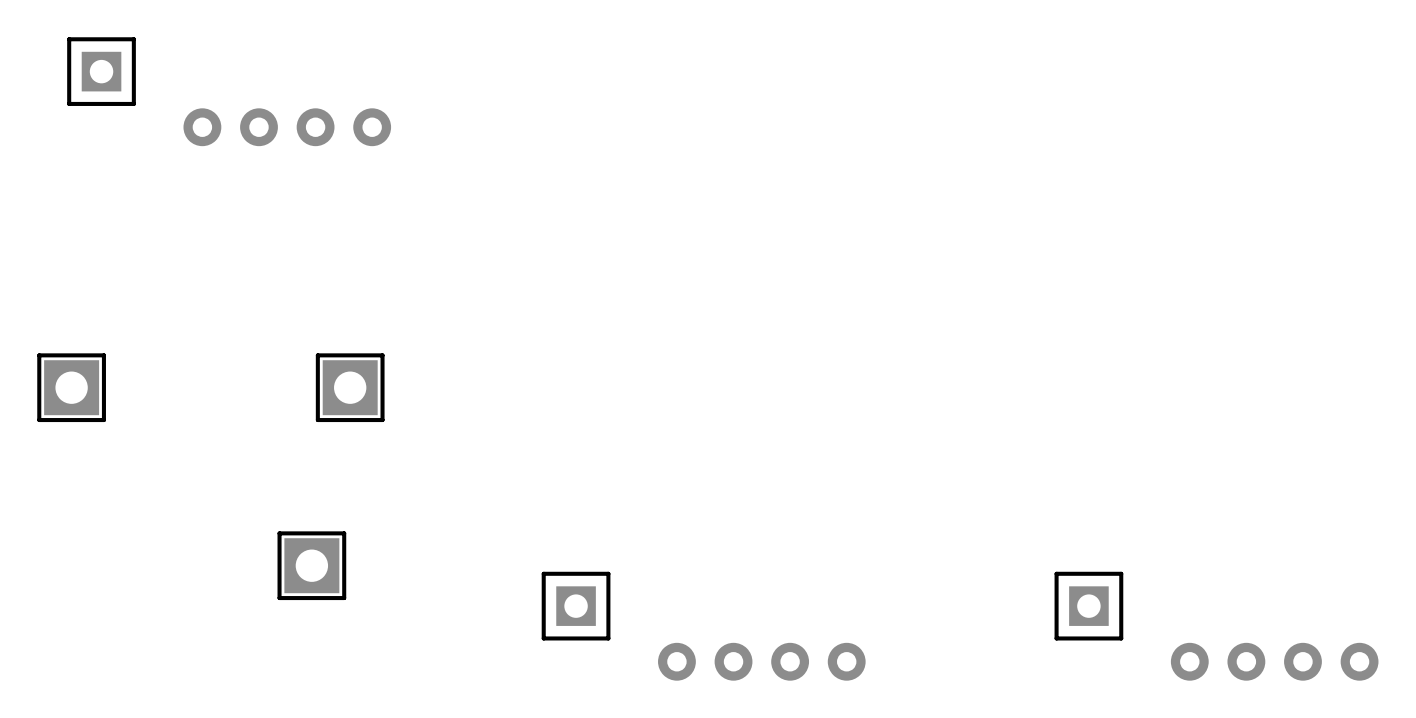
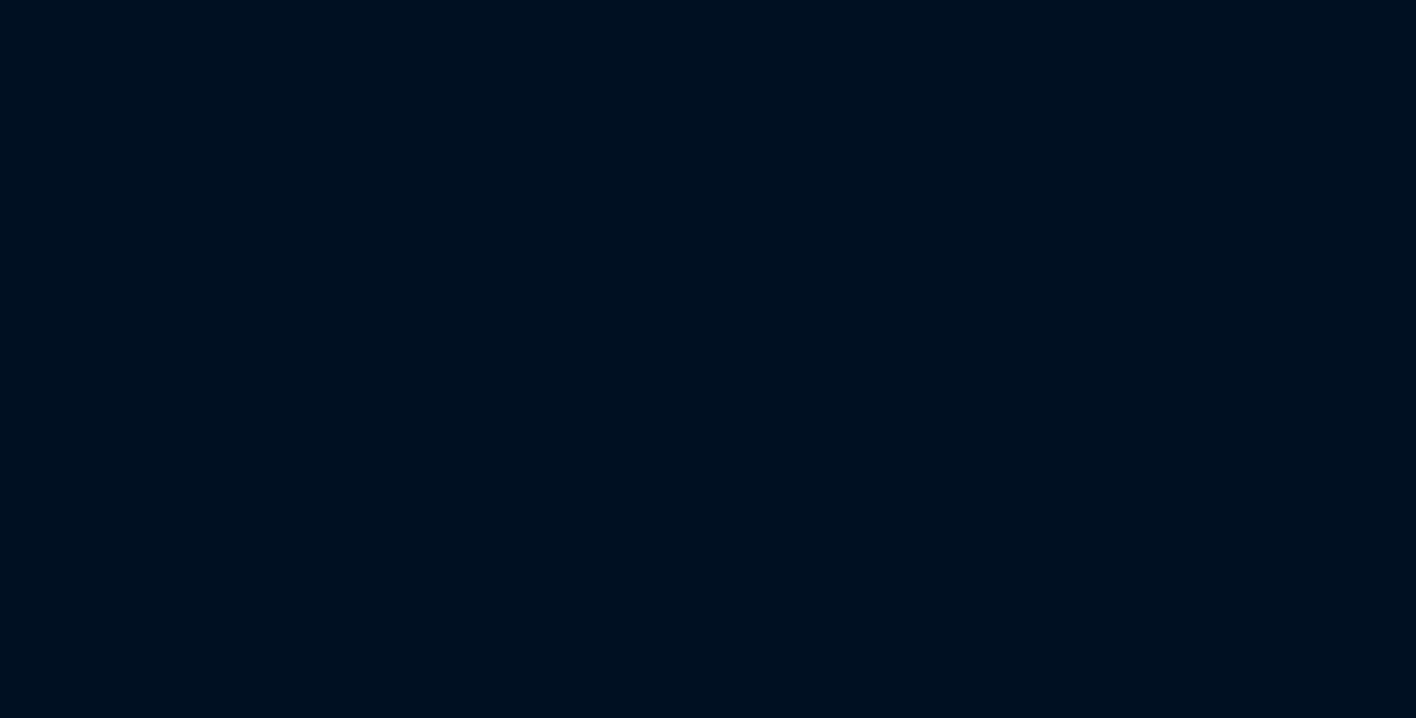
part: (101, 71) -> none
part: (287, 127) -> none
part: (71, 387) -> none
part: (350, 387) -> none
part: (311, 565) -> none
part: (576, 606) -> none
part: (1088, 606) -> none
part: (761, 661) -> none
part: (1274, 661) -> none

